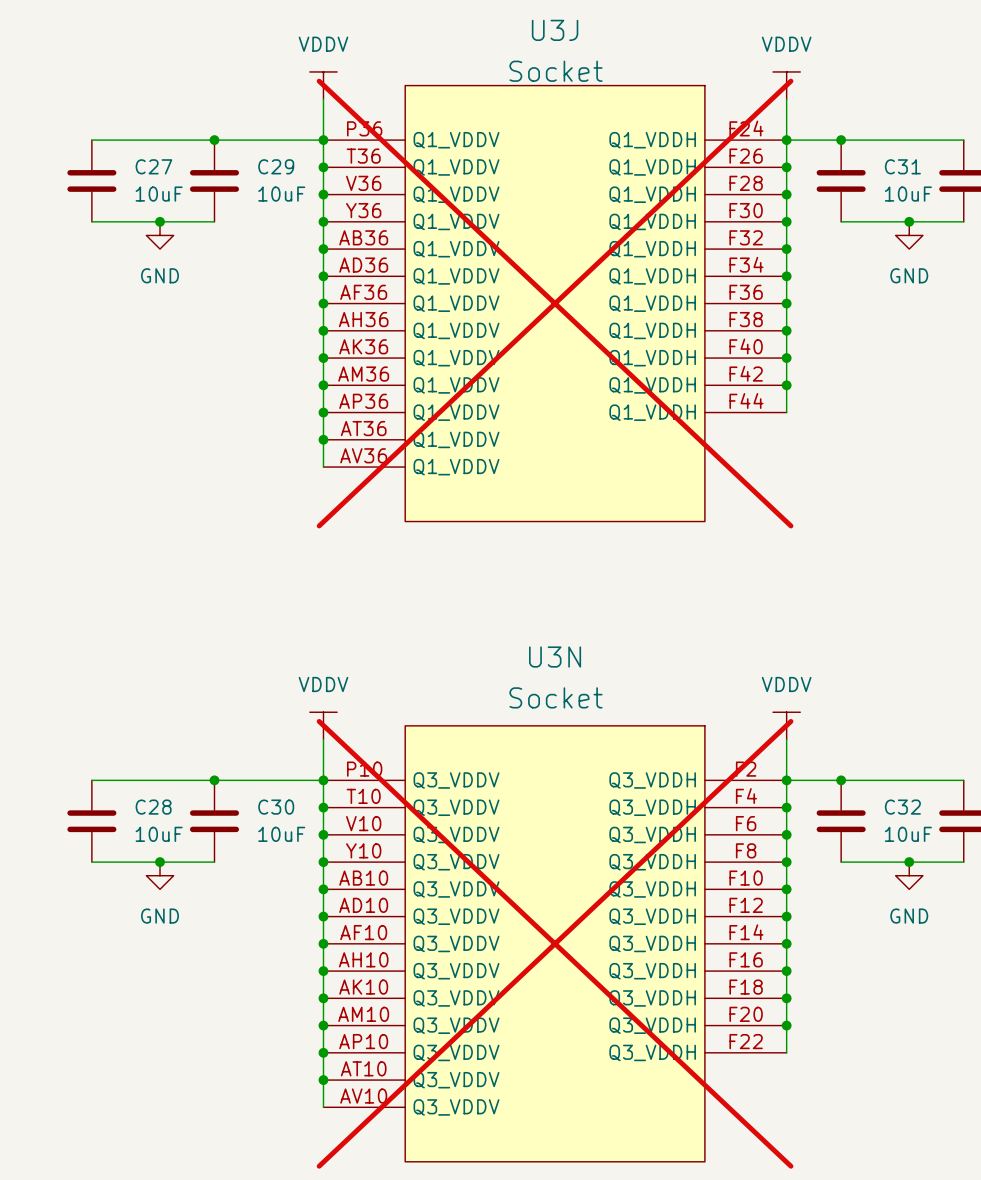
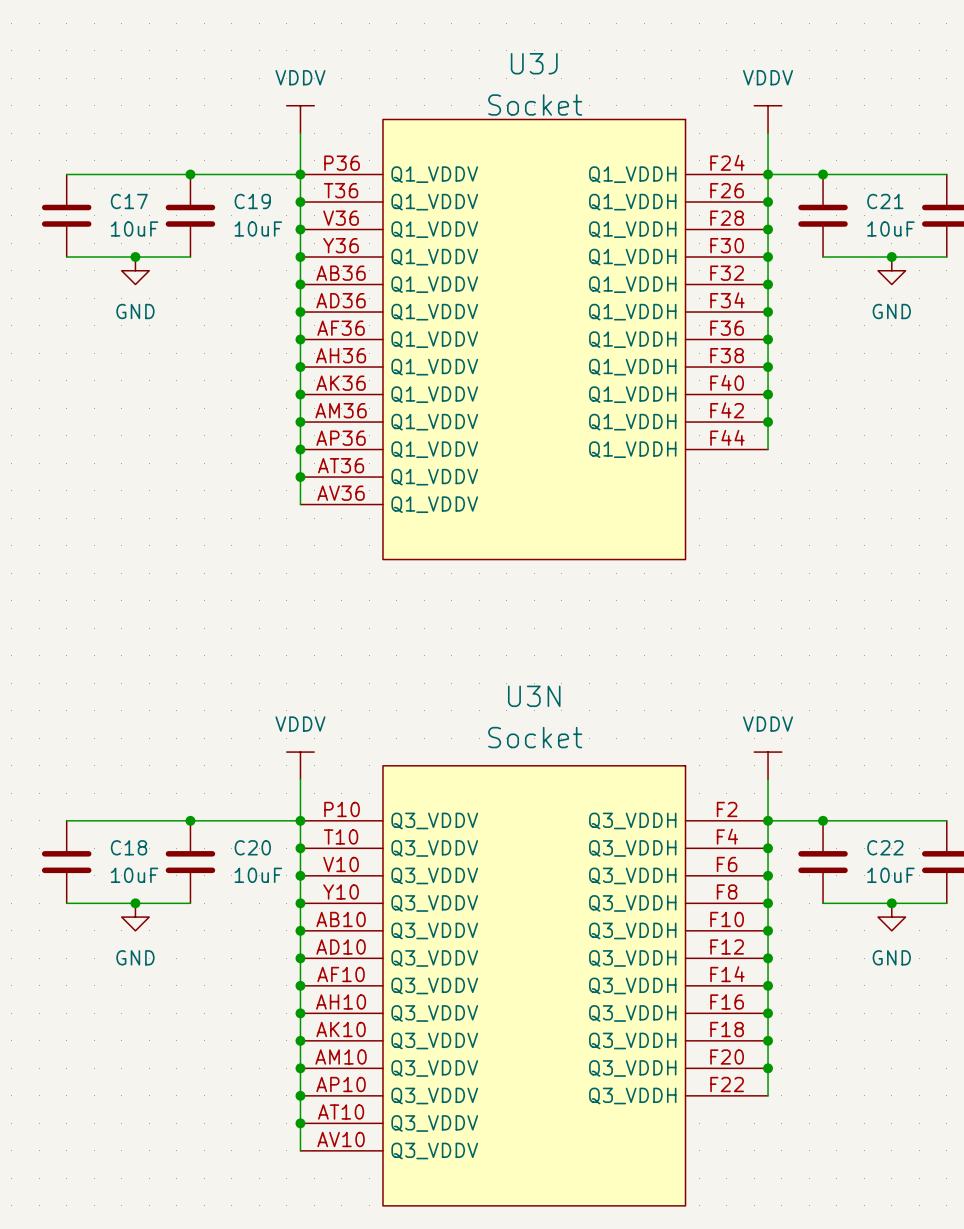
C27 name: C27 (153, 166) -> C17 (129, 201)
C29 name: C29 (276, 166) -> C19 (252, 201)
C31 name: C31 (902, 166) -> C21 (885, 201)
U3J do-not-place cross: (555, 303) -> none
C28 name: C28 (153, 807) -> C18 (129, 847)
C30 name: C30 (276, 807) -> C20 (252, 847)
C32 name: C32 (902, 807) -> C22 (885, 847)
U3N do-not-place cross: (555, 943) -> none

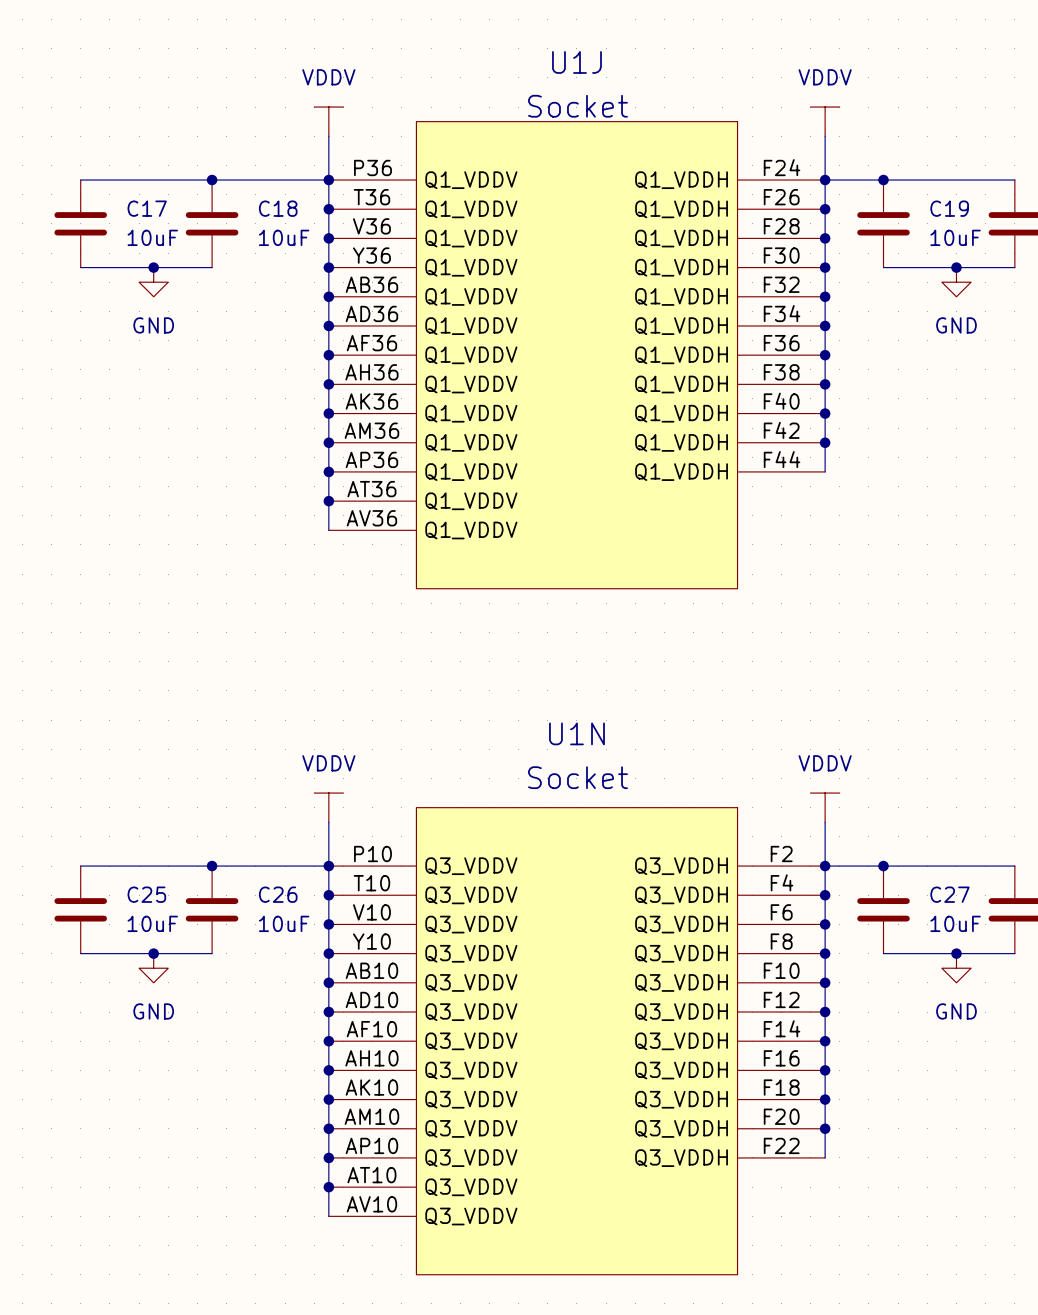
U3J name: U3J (534, 63) -> U1J (576, 62)
C19 name: C19 (252, 201) -> C18 (278, 208)
C21 name: C21 (885, 201) -> C19 (949, 208)
U3N name: U3N (534, 696) -> U1N (576, 733)
C18 name: C18 (129, 847) -> C25 (146, 894)
C20 name: C20 (252, 847) -> C26 (278, 894)
C22 name: C22 (885, 847) -> C27 (949, 894)

